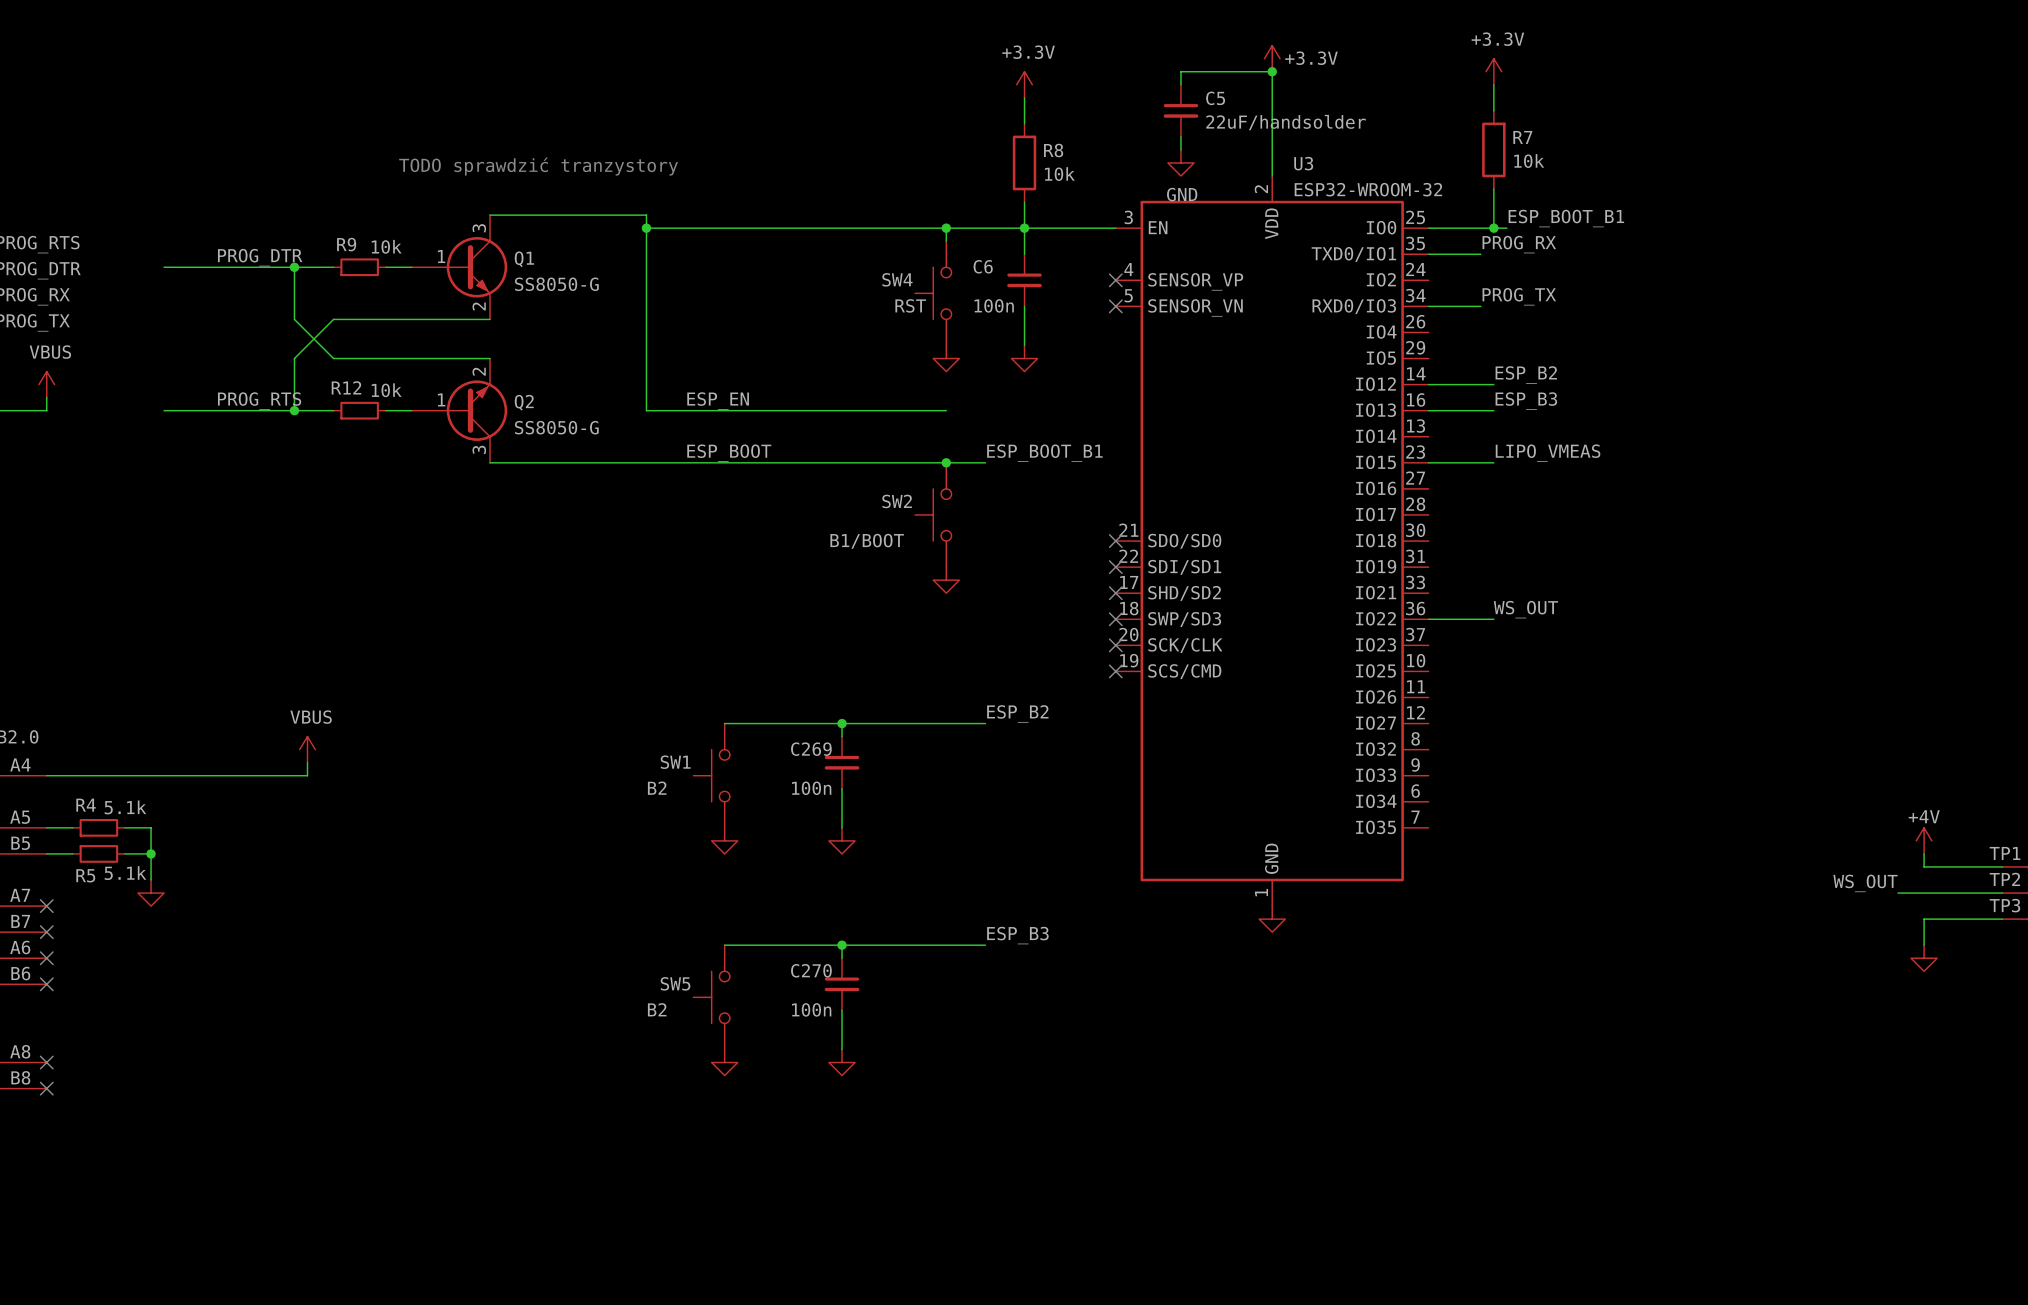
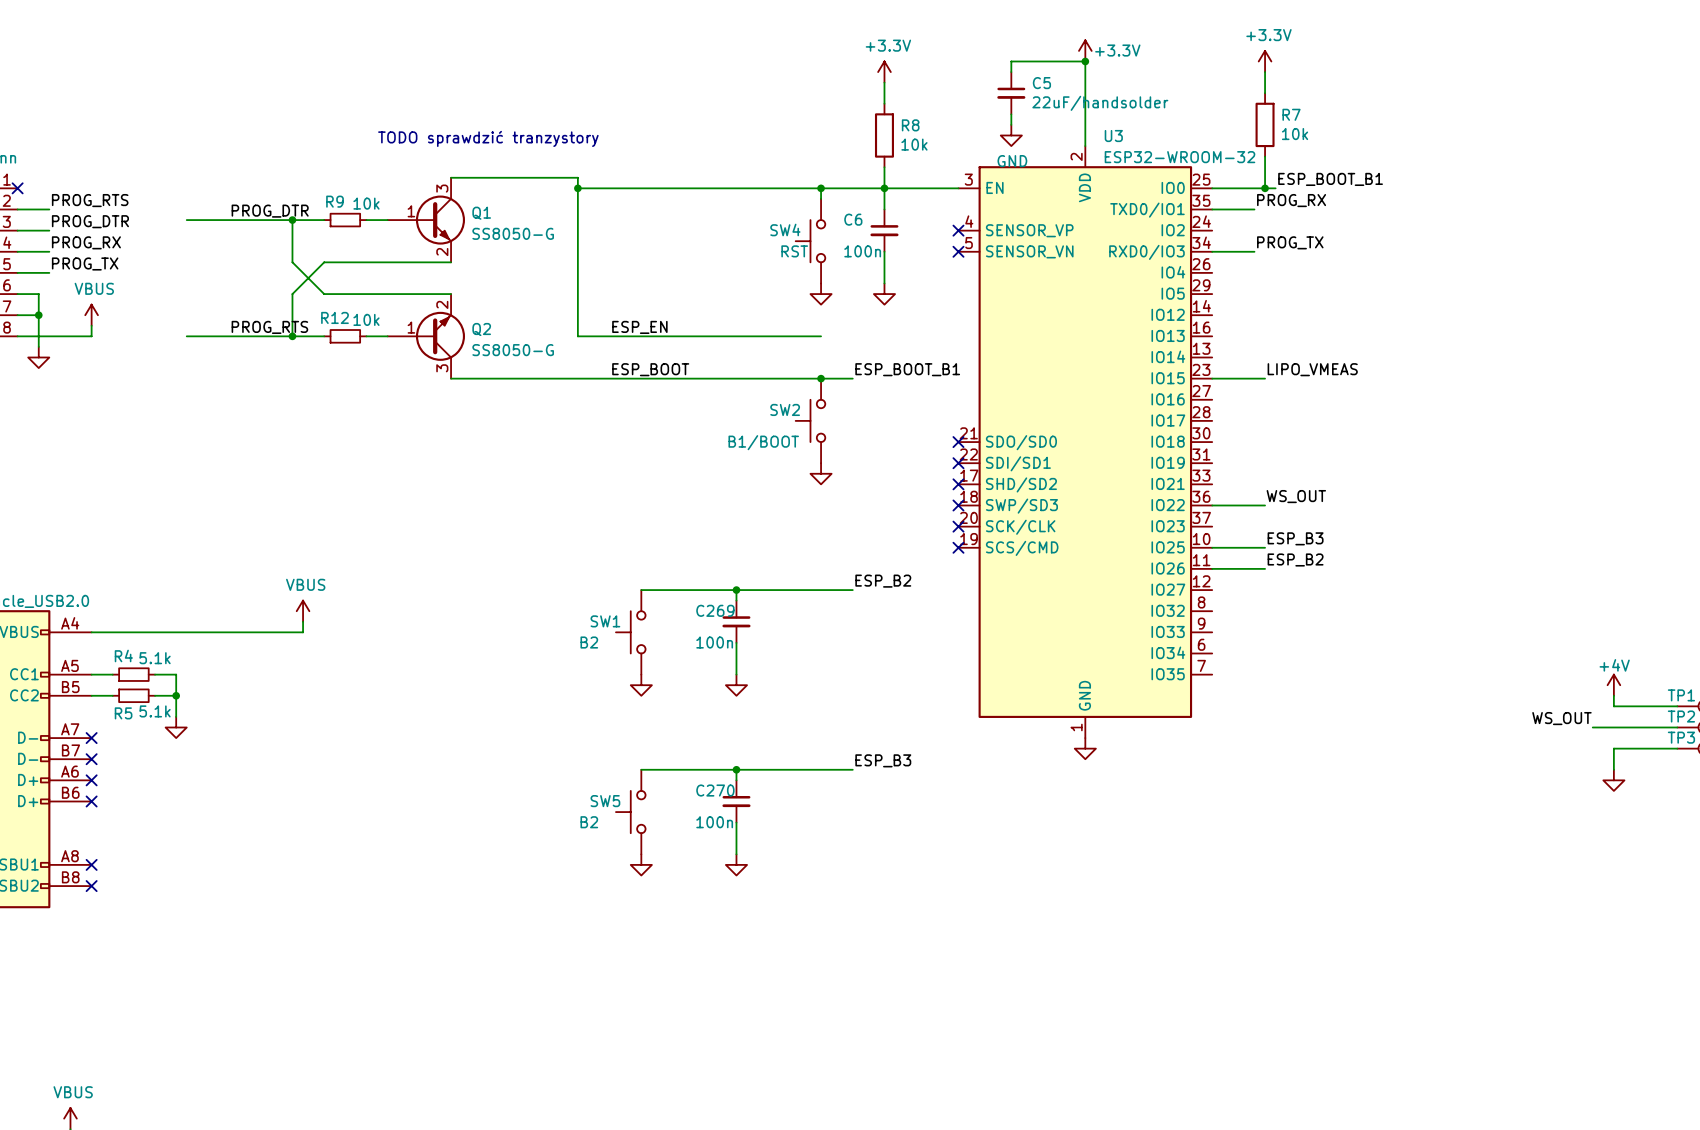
label: ESP_B2 (1526, 374) -> none
wire: (1428, 384) (1493, 384) -> none
label: ESP_B3 (1526, 401) -> none
wire: (1428, 410) (1493, 410) -> none
label: none -> ESP_B3 (1295, 538)
wire: none -> (1212, 547) (1265, 547)
label: none -> ESP_B2 (1295, 559)
wire: none -> (1212, 568) (1265, 568)

